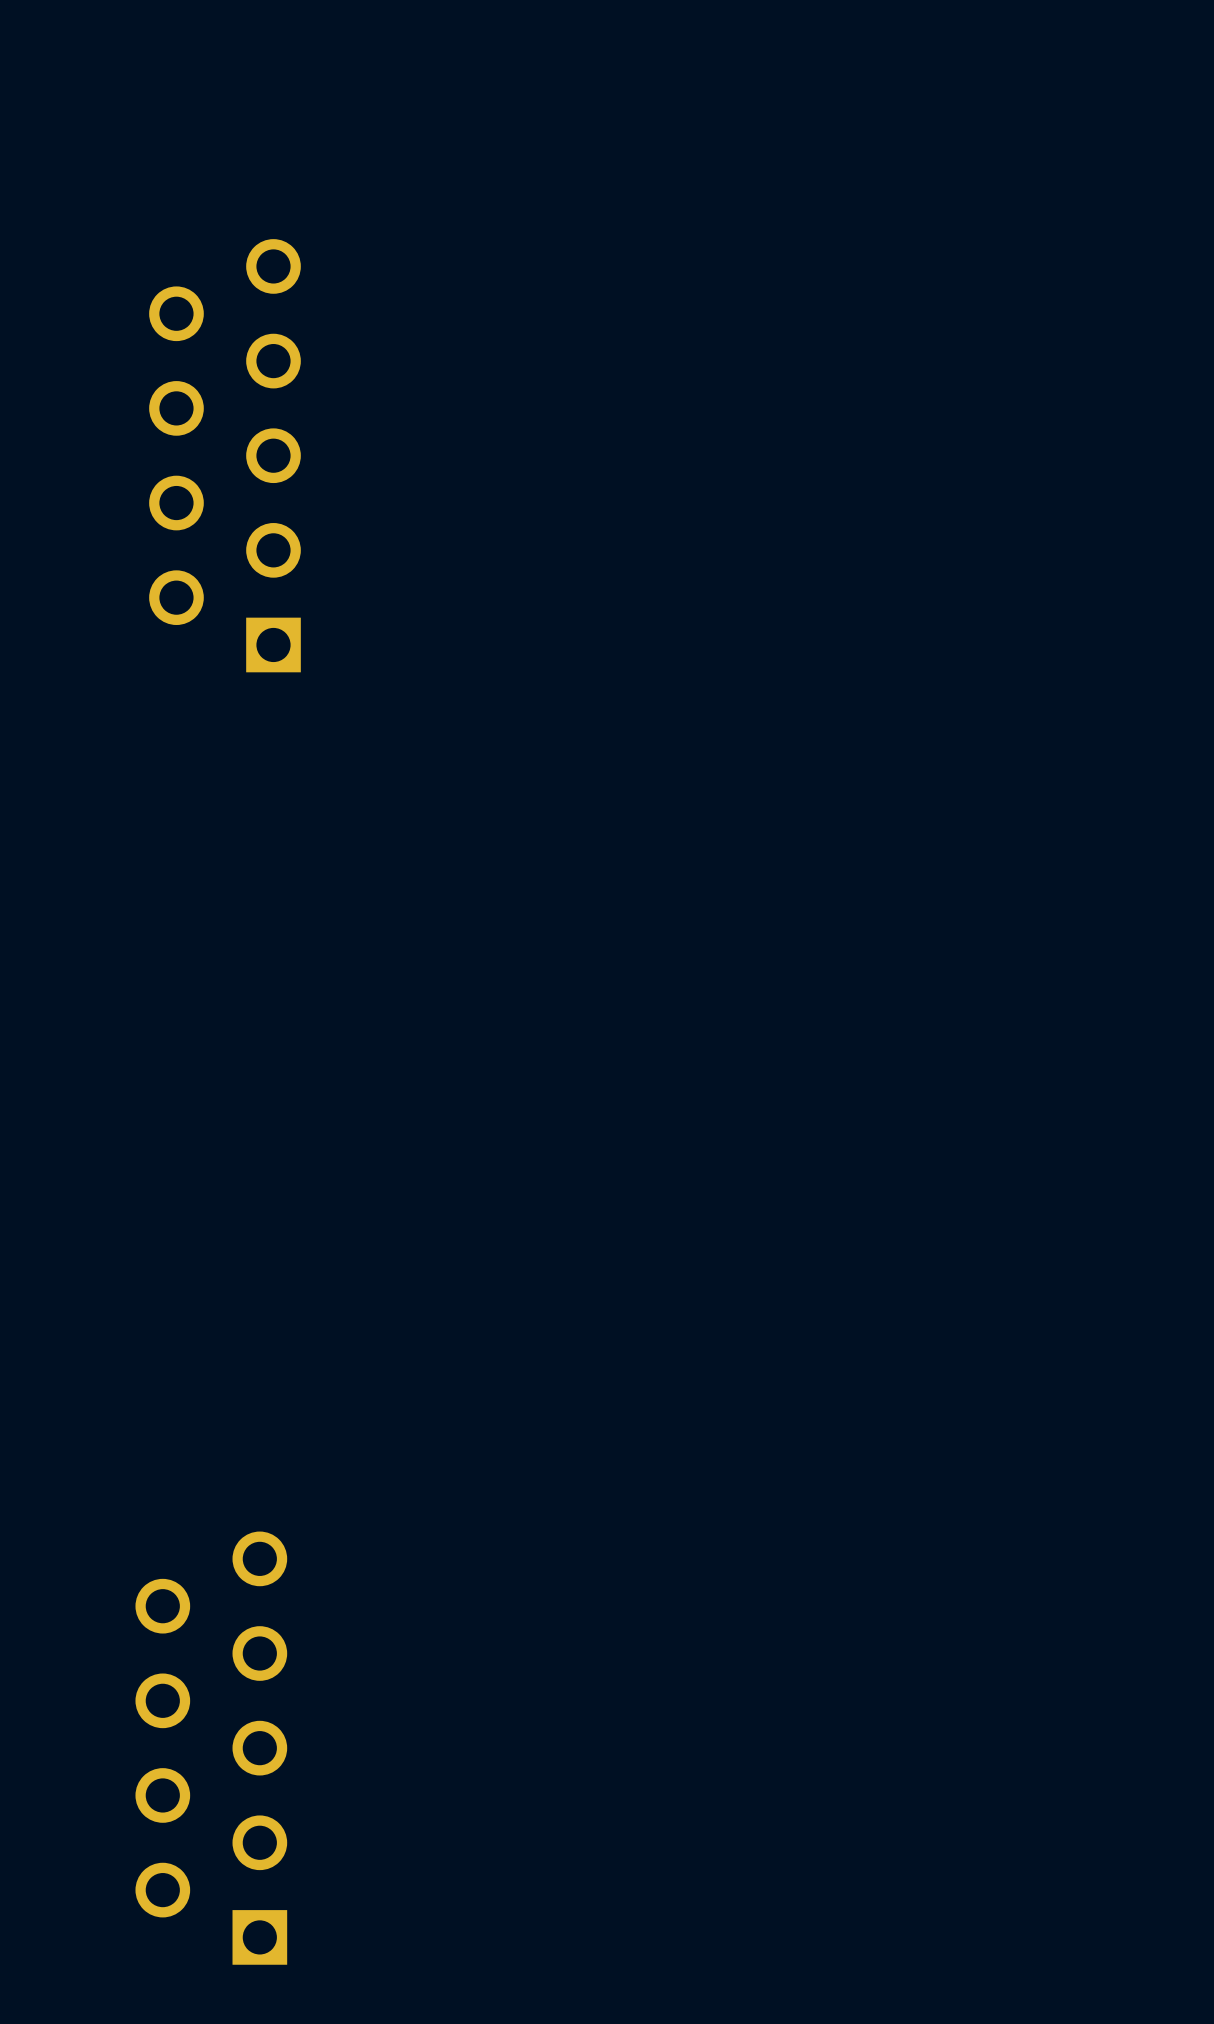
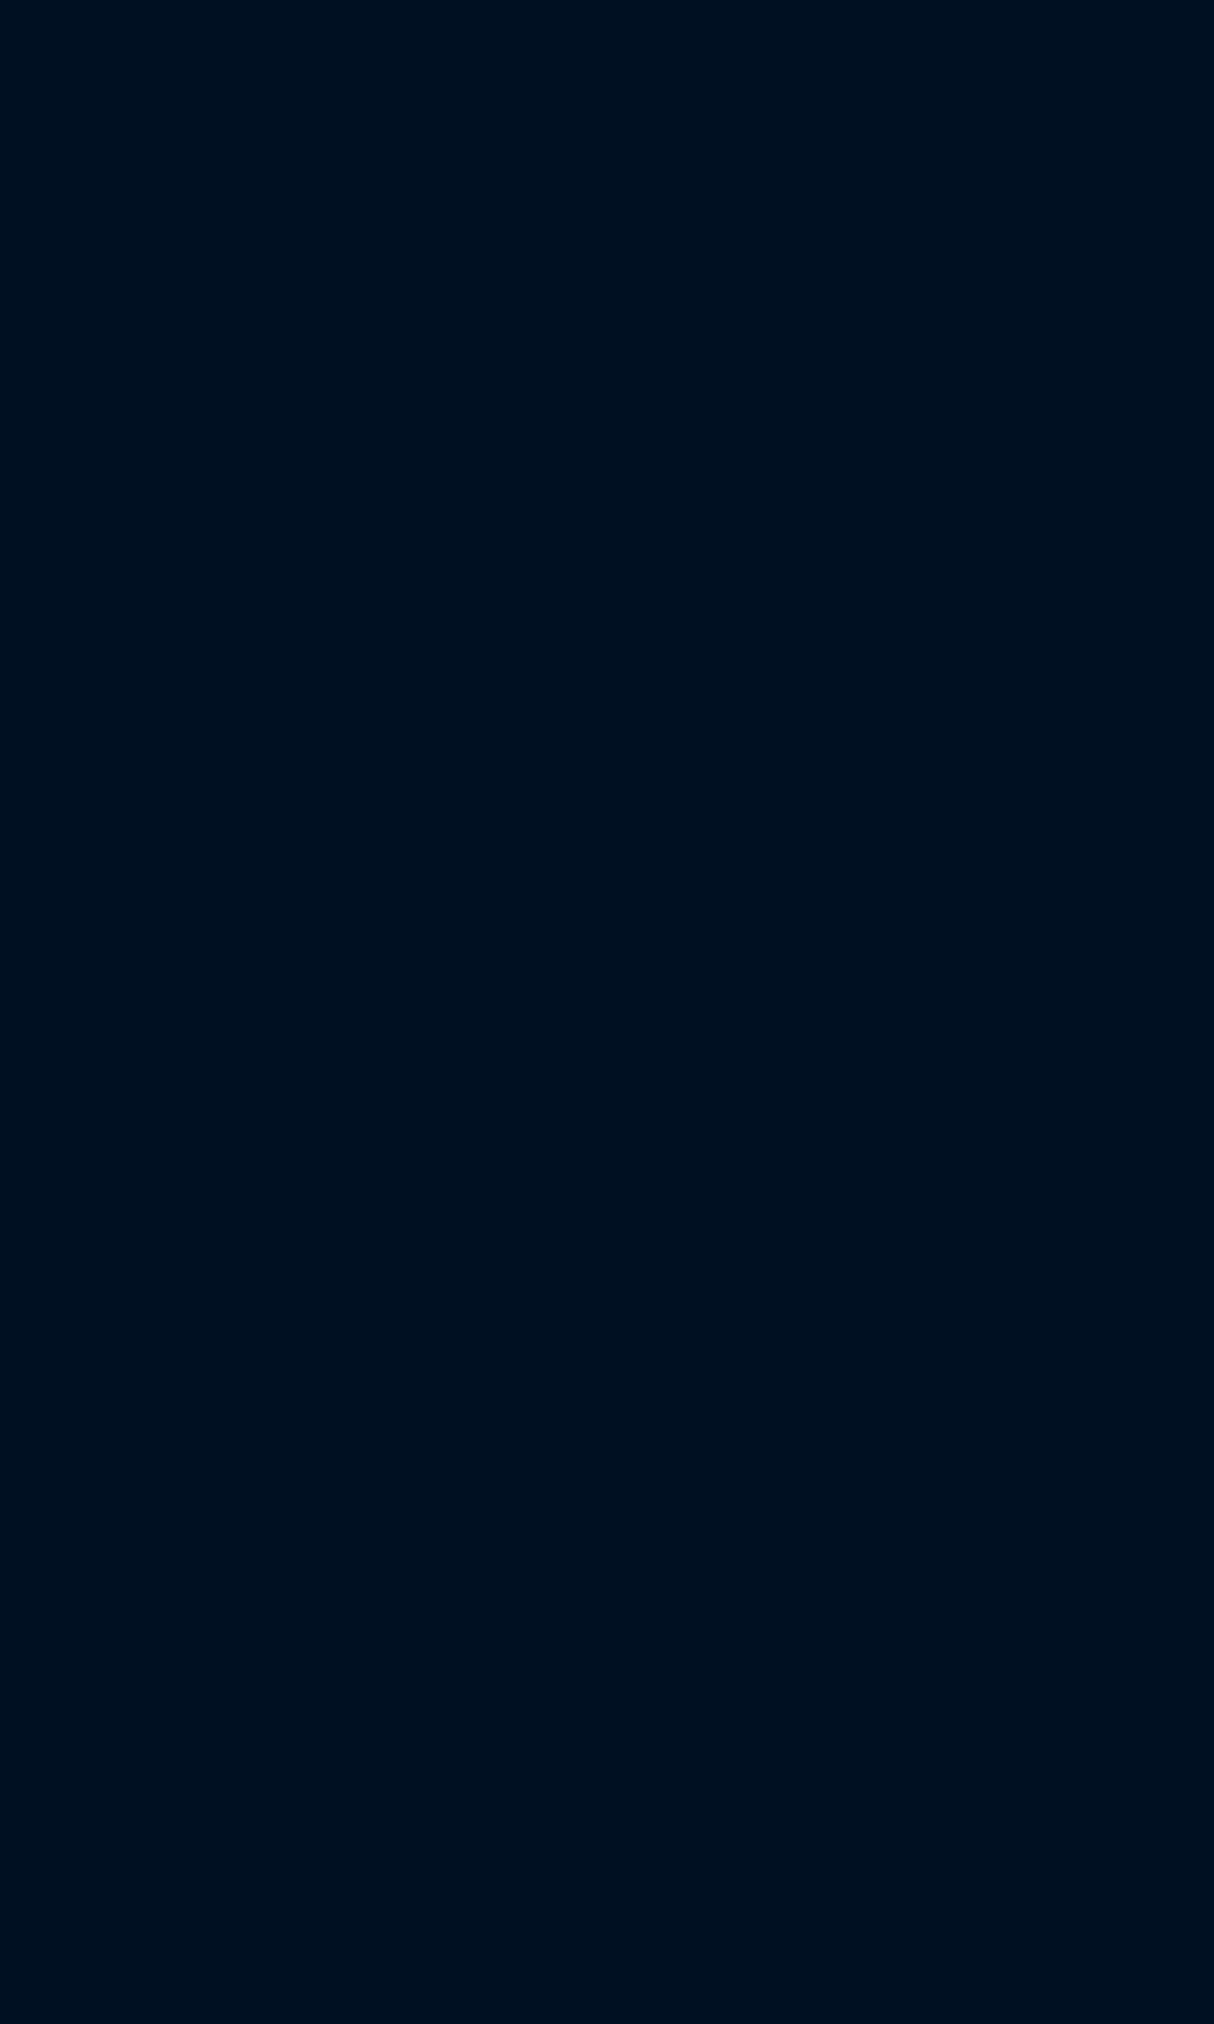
part: (224, 455) -> none
part: (211, 1748) -> none

